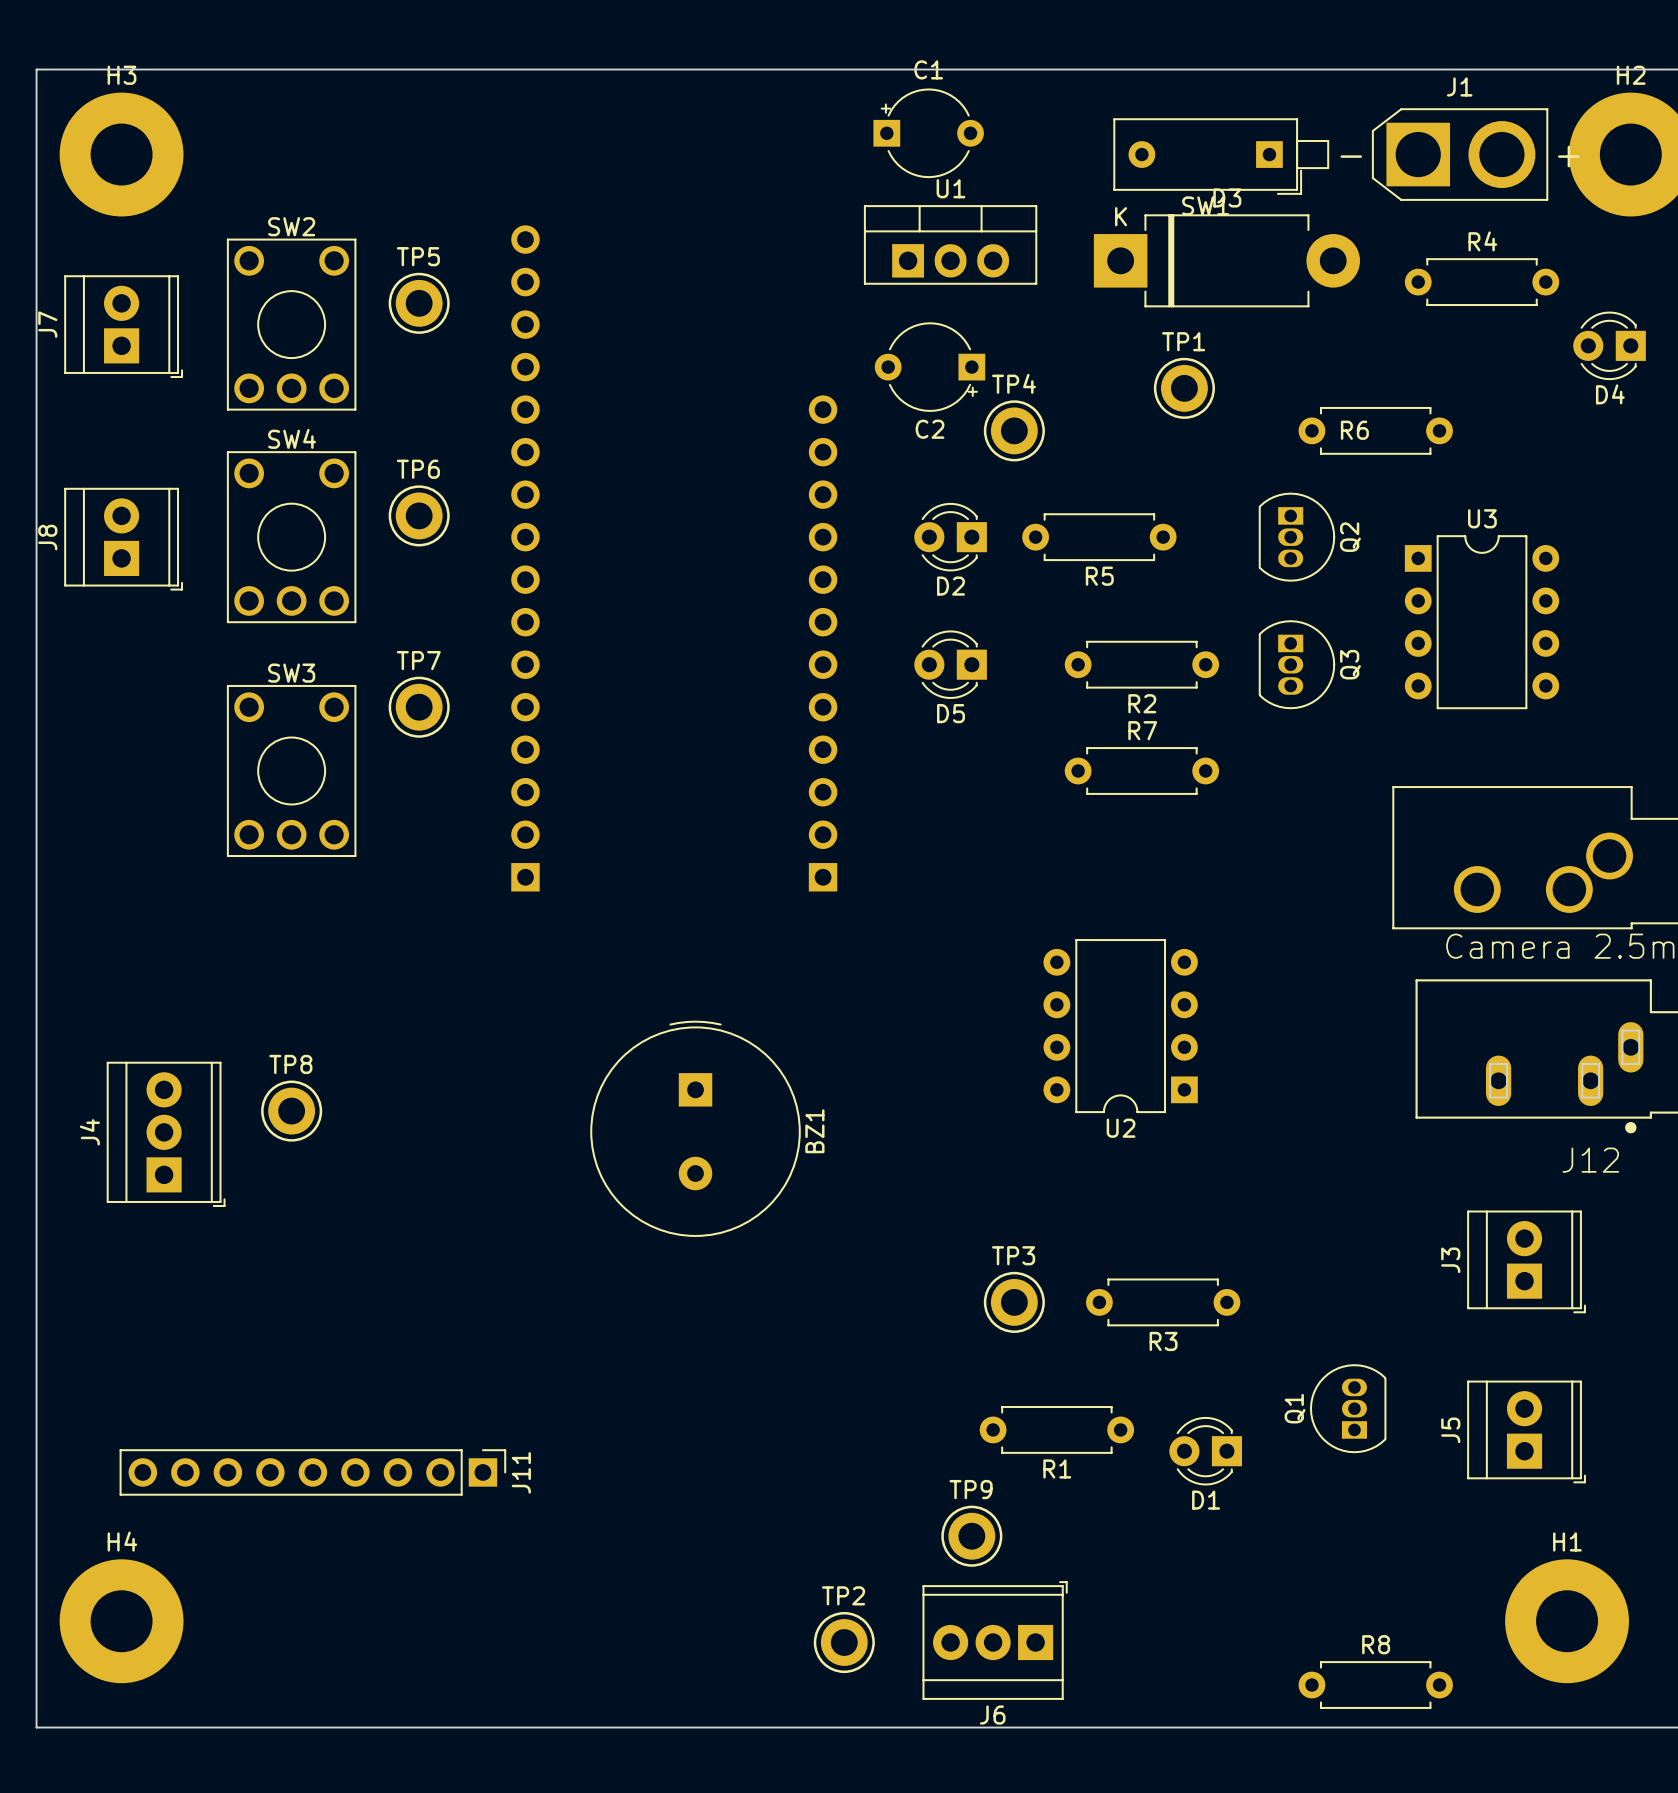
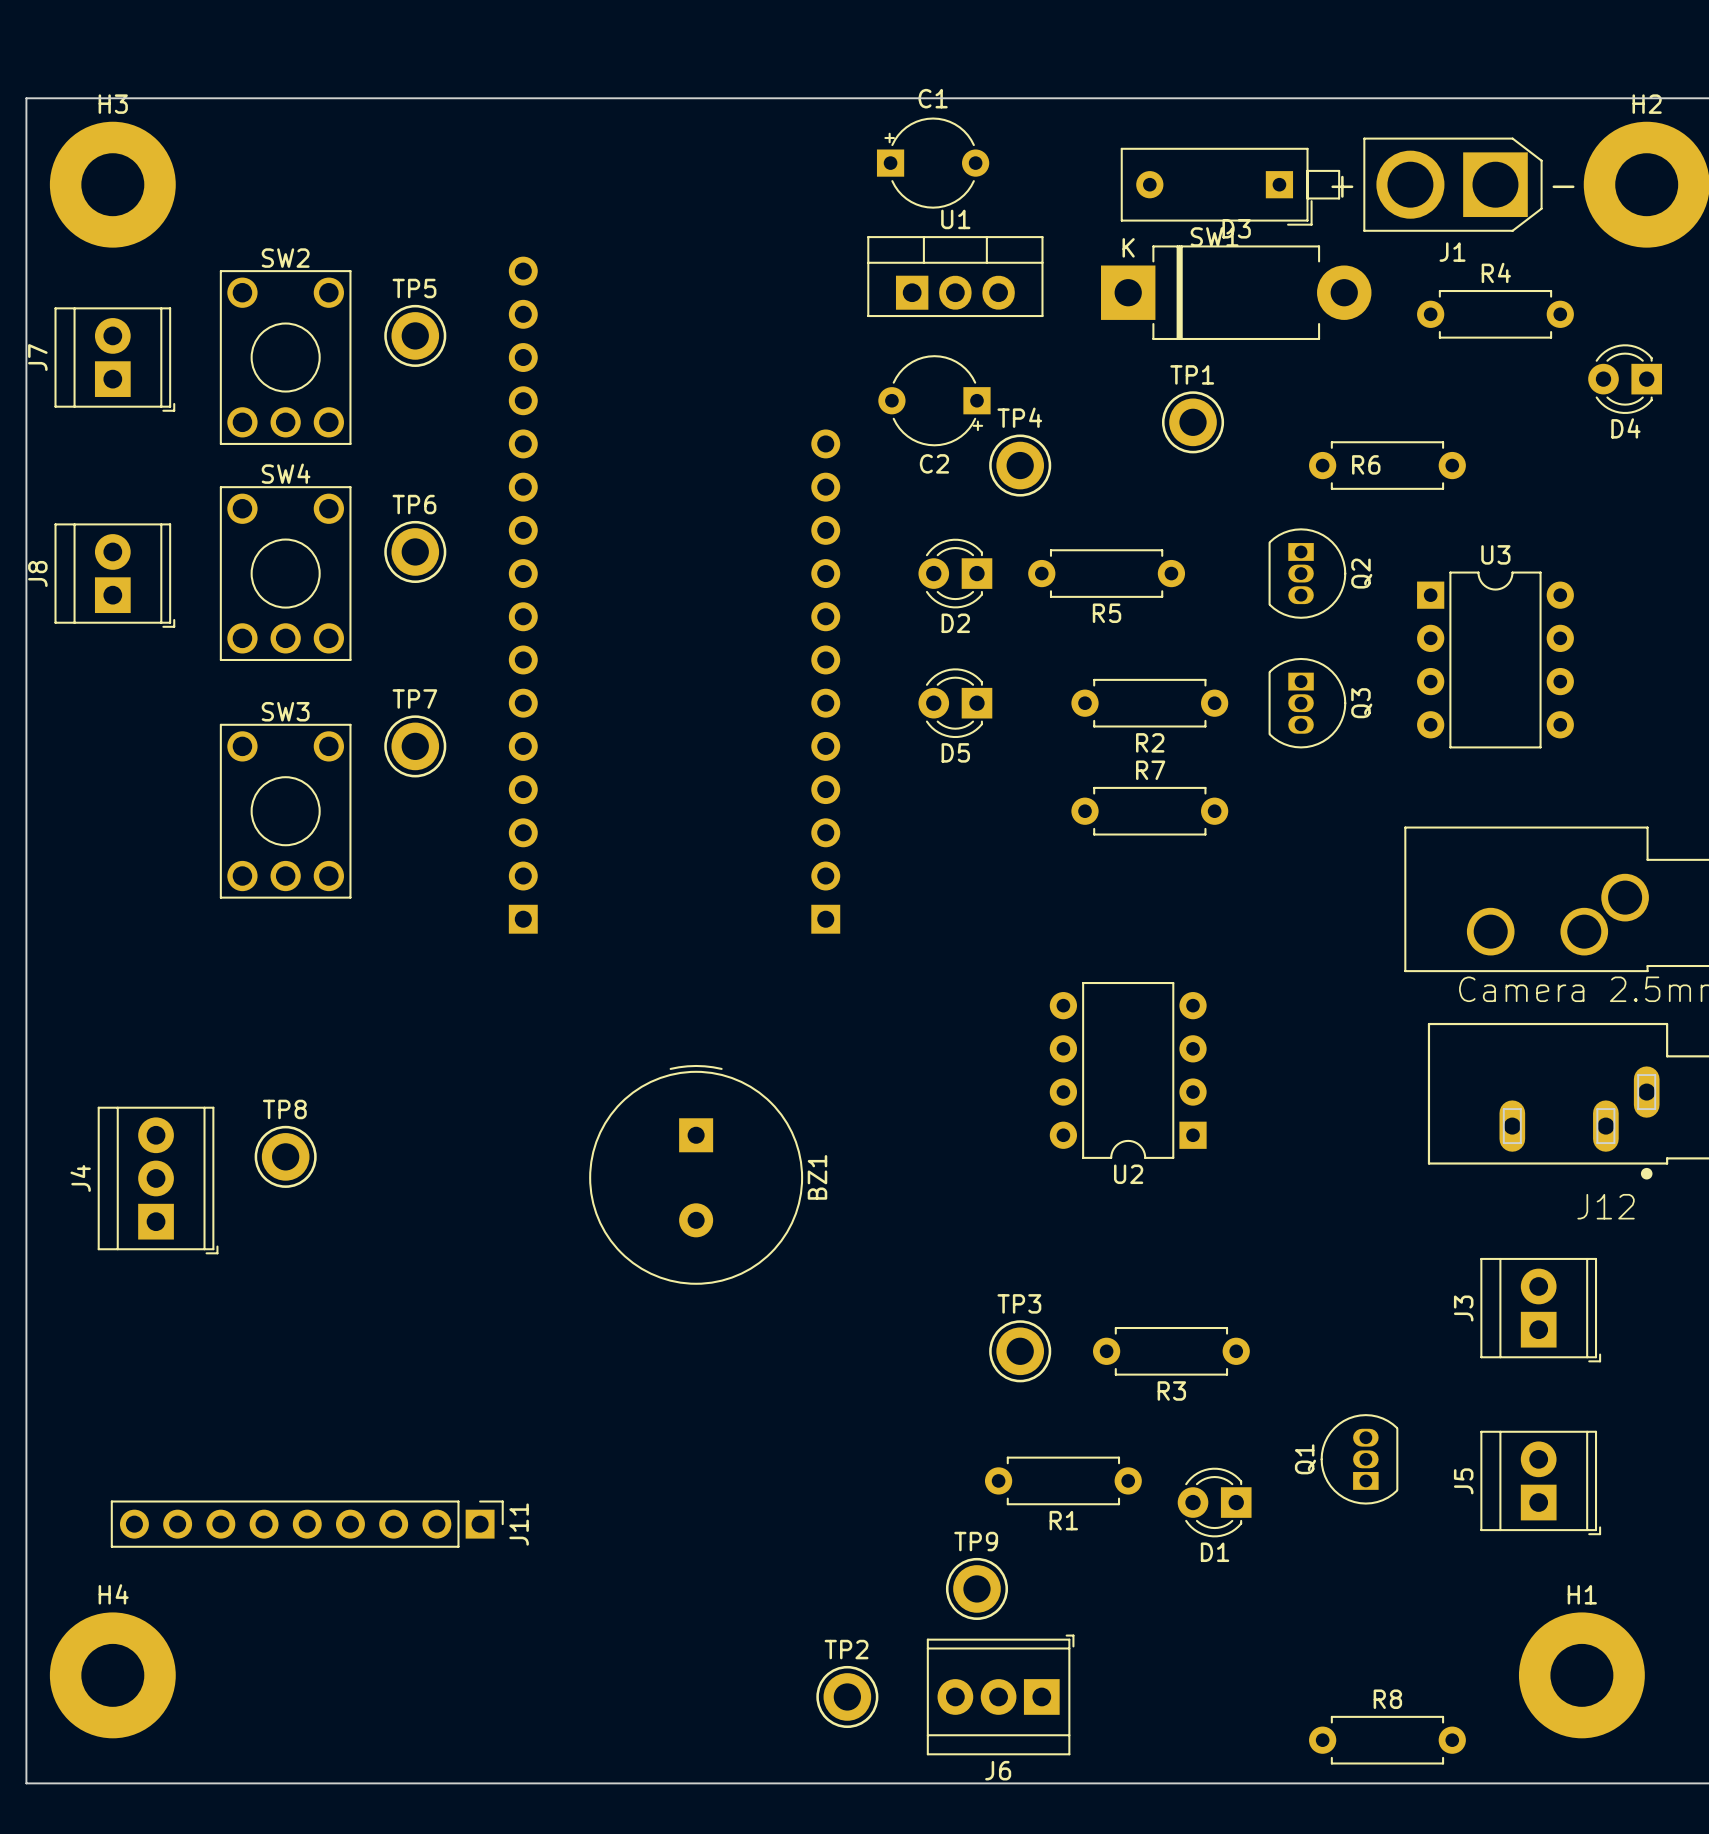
J1 rotation: 0° (1460, 154) -> 180° (1452, 184)

